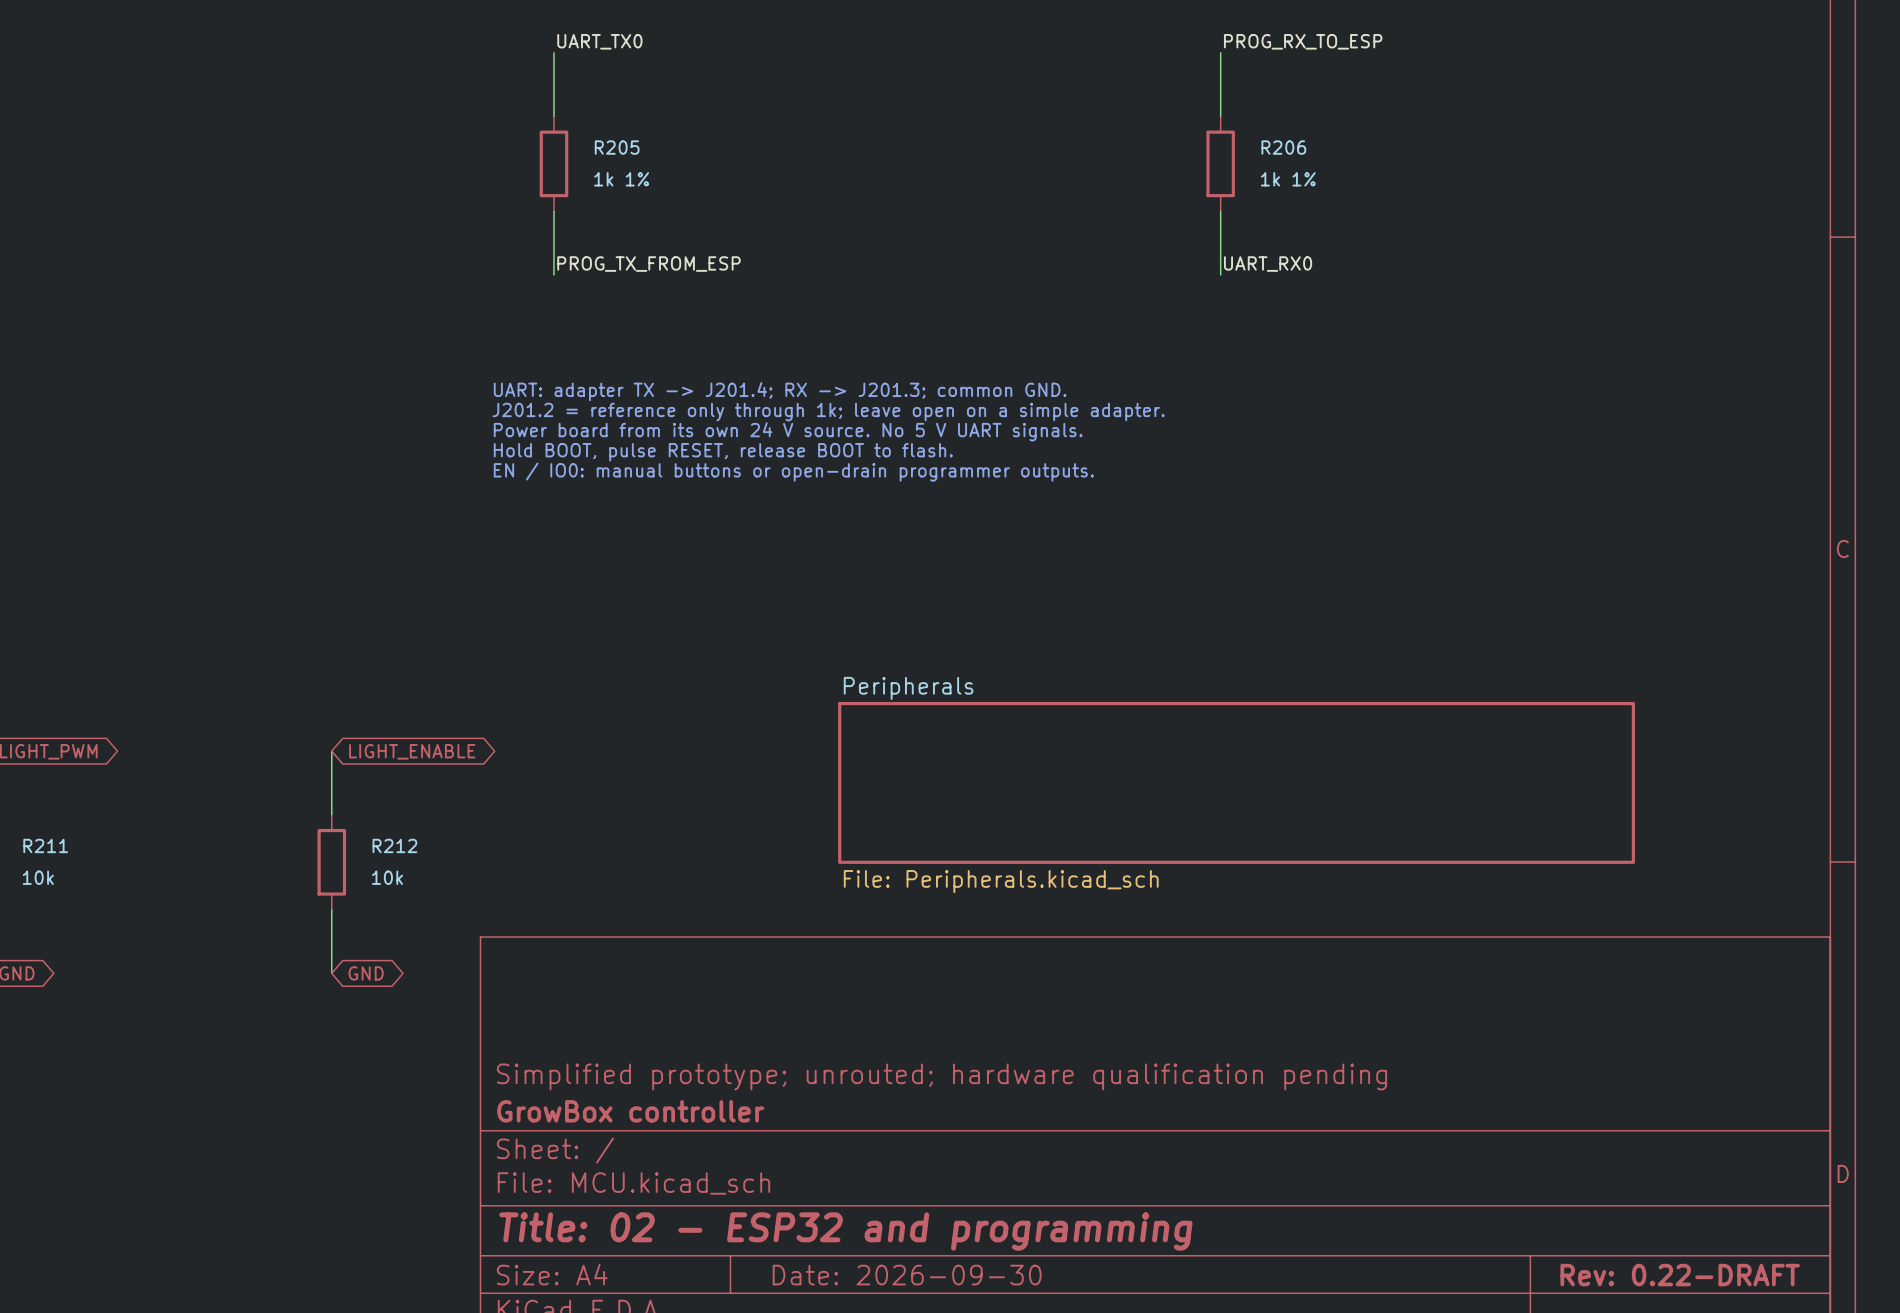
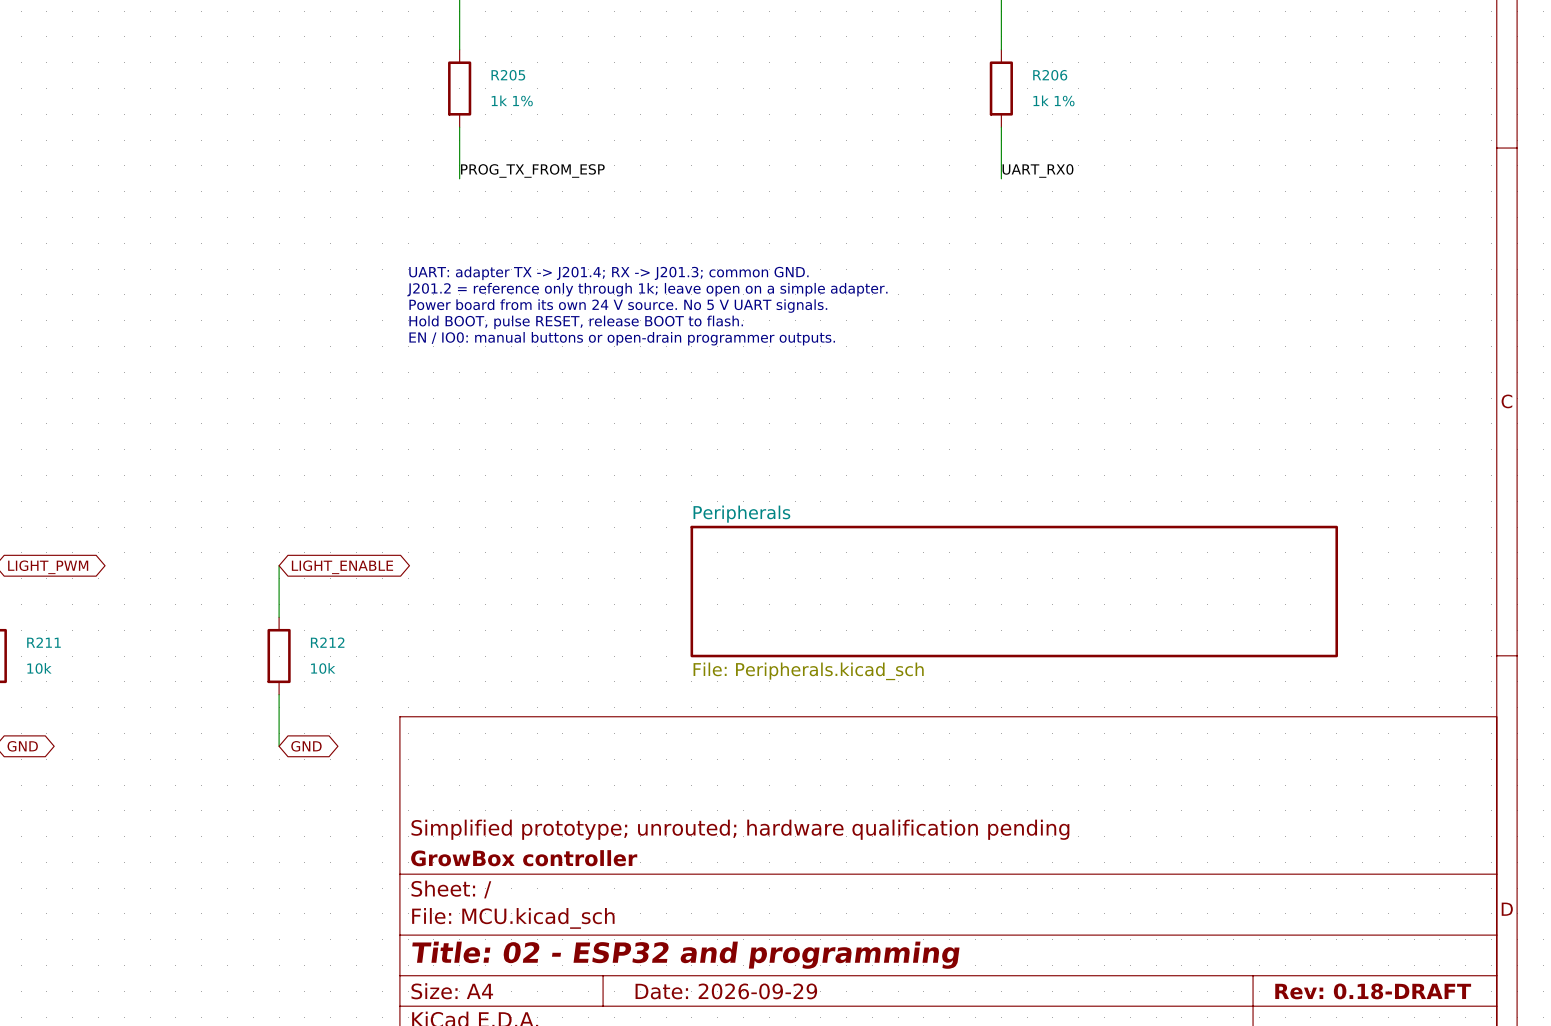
title block: Date: 2026-09-30 (907, 1275) -> Date: 2026-09-29 (726, 991)
title block: Rev: 0.22-DRAFT (1680, 1275) -> Rev: 0.18-DRAFT (1373, 991)

